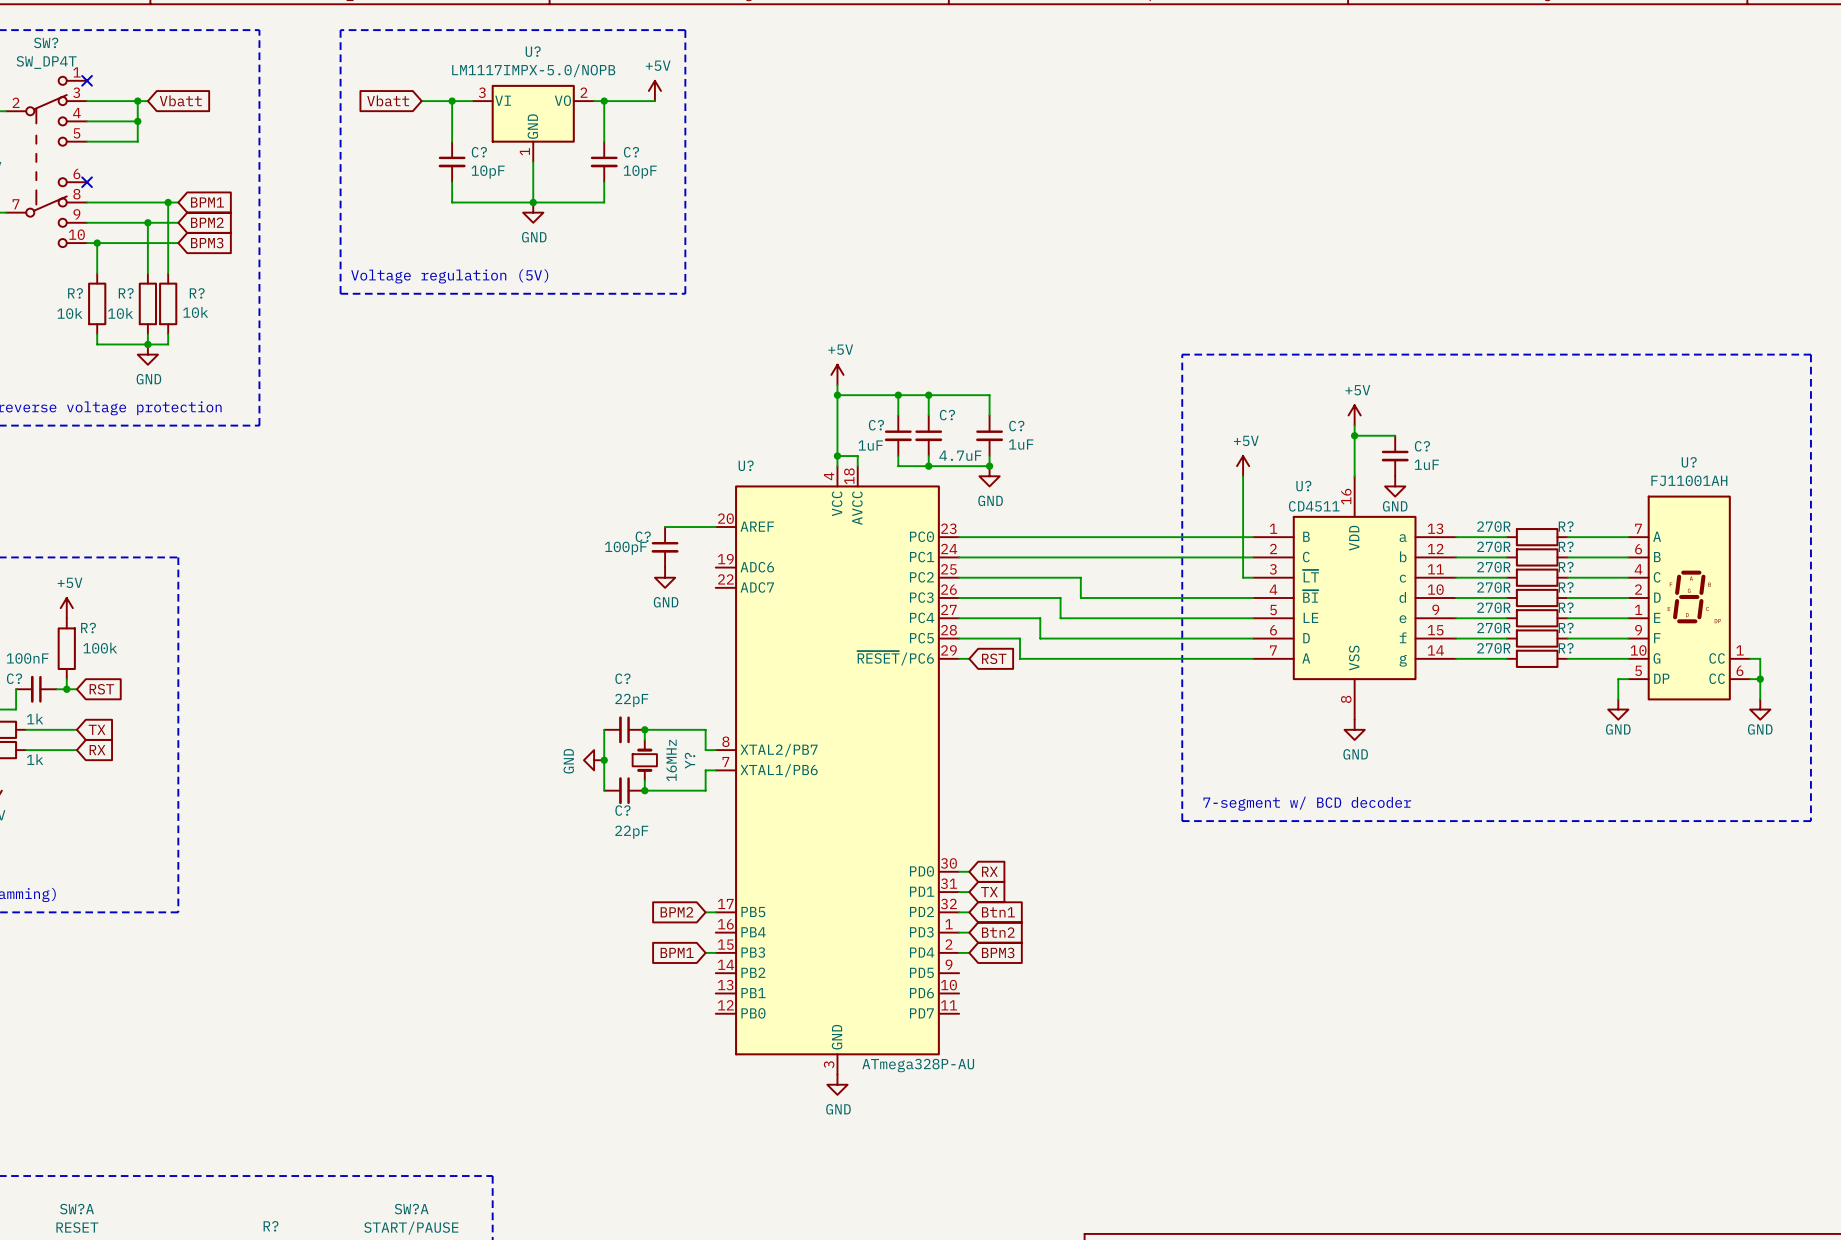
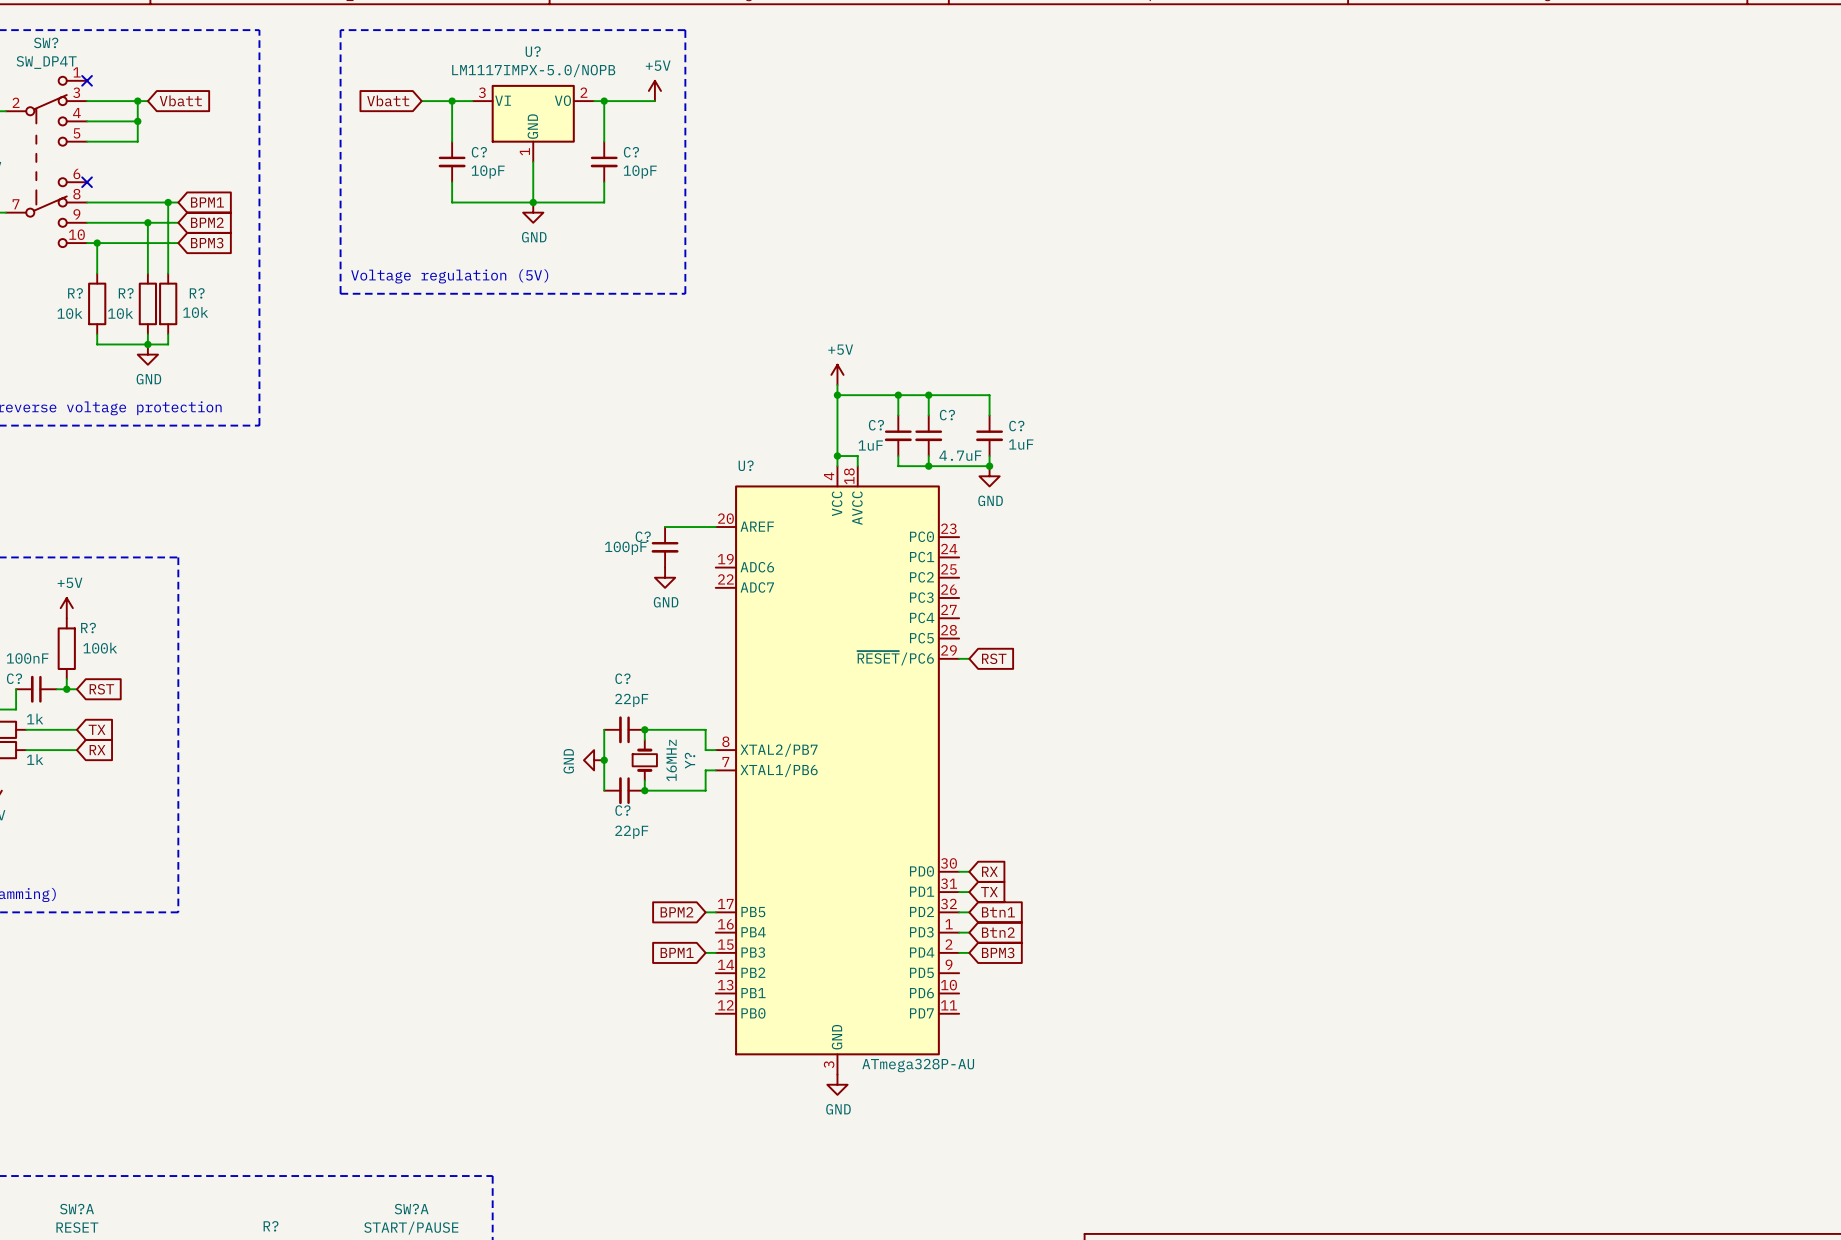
line: (1182, 354) (1182, 821) (1810, 821) (1810, 354) (1182, 354) -> none
power symbol: +5V (1354, 415) -> none
wire: (1354, 425) (1354, 476) -> none
wire: (1354, 435) (1395, 435) -> none
junction: (1354, 435) -> none
C?: 1uF (1395, 456) -> none
power symbol: +5V (1243, 466) -> none
wire: (1243, 476) (1243, 577) (1253, 577) -> none
power symbol: GND (1395, 486) -> none
wire: (959, 537) (1253, 537) -> none
wire: (1456, 537) (1506, 537) -> none
R?: 270R (1537, 537) -> none
wire: (1567, 537) (1628, 537) -> none
wire: (959, 557) (1253, 557) -> none
wire: (1456, 557) (1506, 557) -> none
R?: 270R (1537, 557) -> none
wire: (1567, 557) (1628, 557) -> none
wire: (959, 577) (1080, 577) (1080, 597) (1253, 597) -> none
wire: (1456, 577) (1506, 577) -> none
R?: 270R (1537, 577) -> none
wire: (1567, 577) (1628, 577) -> none
wire: (959, 597) (1060, 597) (1060, 618) (1253, 618) -> none
U?: CD4511 (1354, 597) -> none
wire: (1456, 597) (1506, 597) -> none
R?: 270R (1537, 597) -> none
wire: (1567, 597) (1628, 597) -> none
U?: FJ11001AH (1689, 597) -> none
wire: (959, 618) (1040, 618) (1040, 638) (1253, 638) -> none
wire: (1456, 618) (1506, 618) -> none
R?: 270R (1537, 618) -> none
wire: (1567, 618) (1628, 618) -> none
wire: (959, 638) (1019, 638) (1019, 658) (1253, 658) -> none
wire: (1456, 638) (1506, 638) -> none
R?: 270R (1537, 638) -> none
wire: (1567, 638) (1628, 638) -> none
wire: (1456, 658) (1506, 658) -> none
R?: 270R (1537, 658) -> none
wire: (1567, 658) (1628, 658) -> none
wire: (1750, 658) (1760, 658) (1760, 699) -> none
wire: (1628, 679) (1618, 679) (1618, 699) -> none
wire: (1750, 679) (1760, 679) -> none
junction: (1760, 679) -> none
power symbol: GND (1618, 709) -> none
power symbol: GND (1760, 709) -> none
power symbol: GND (1354, 729) -> none
text: 7-segment w/ BCD decoder (1307, 803) -> none

